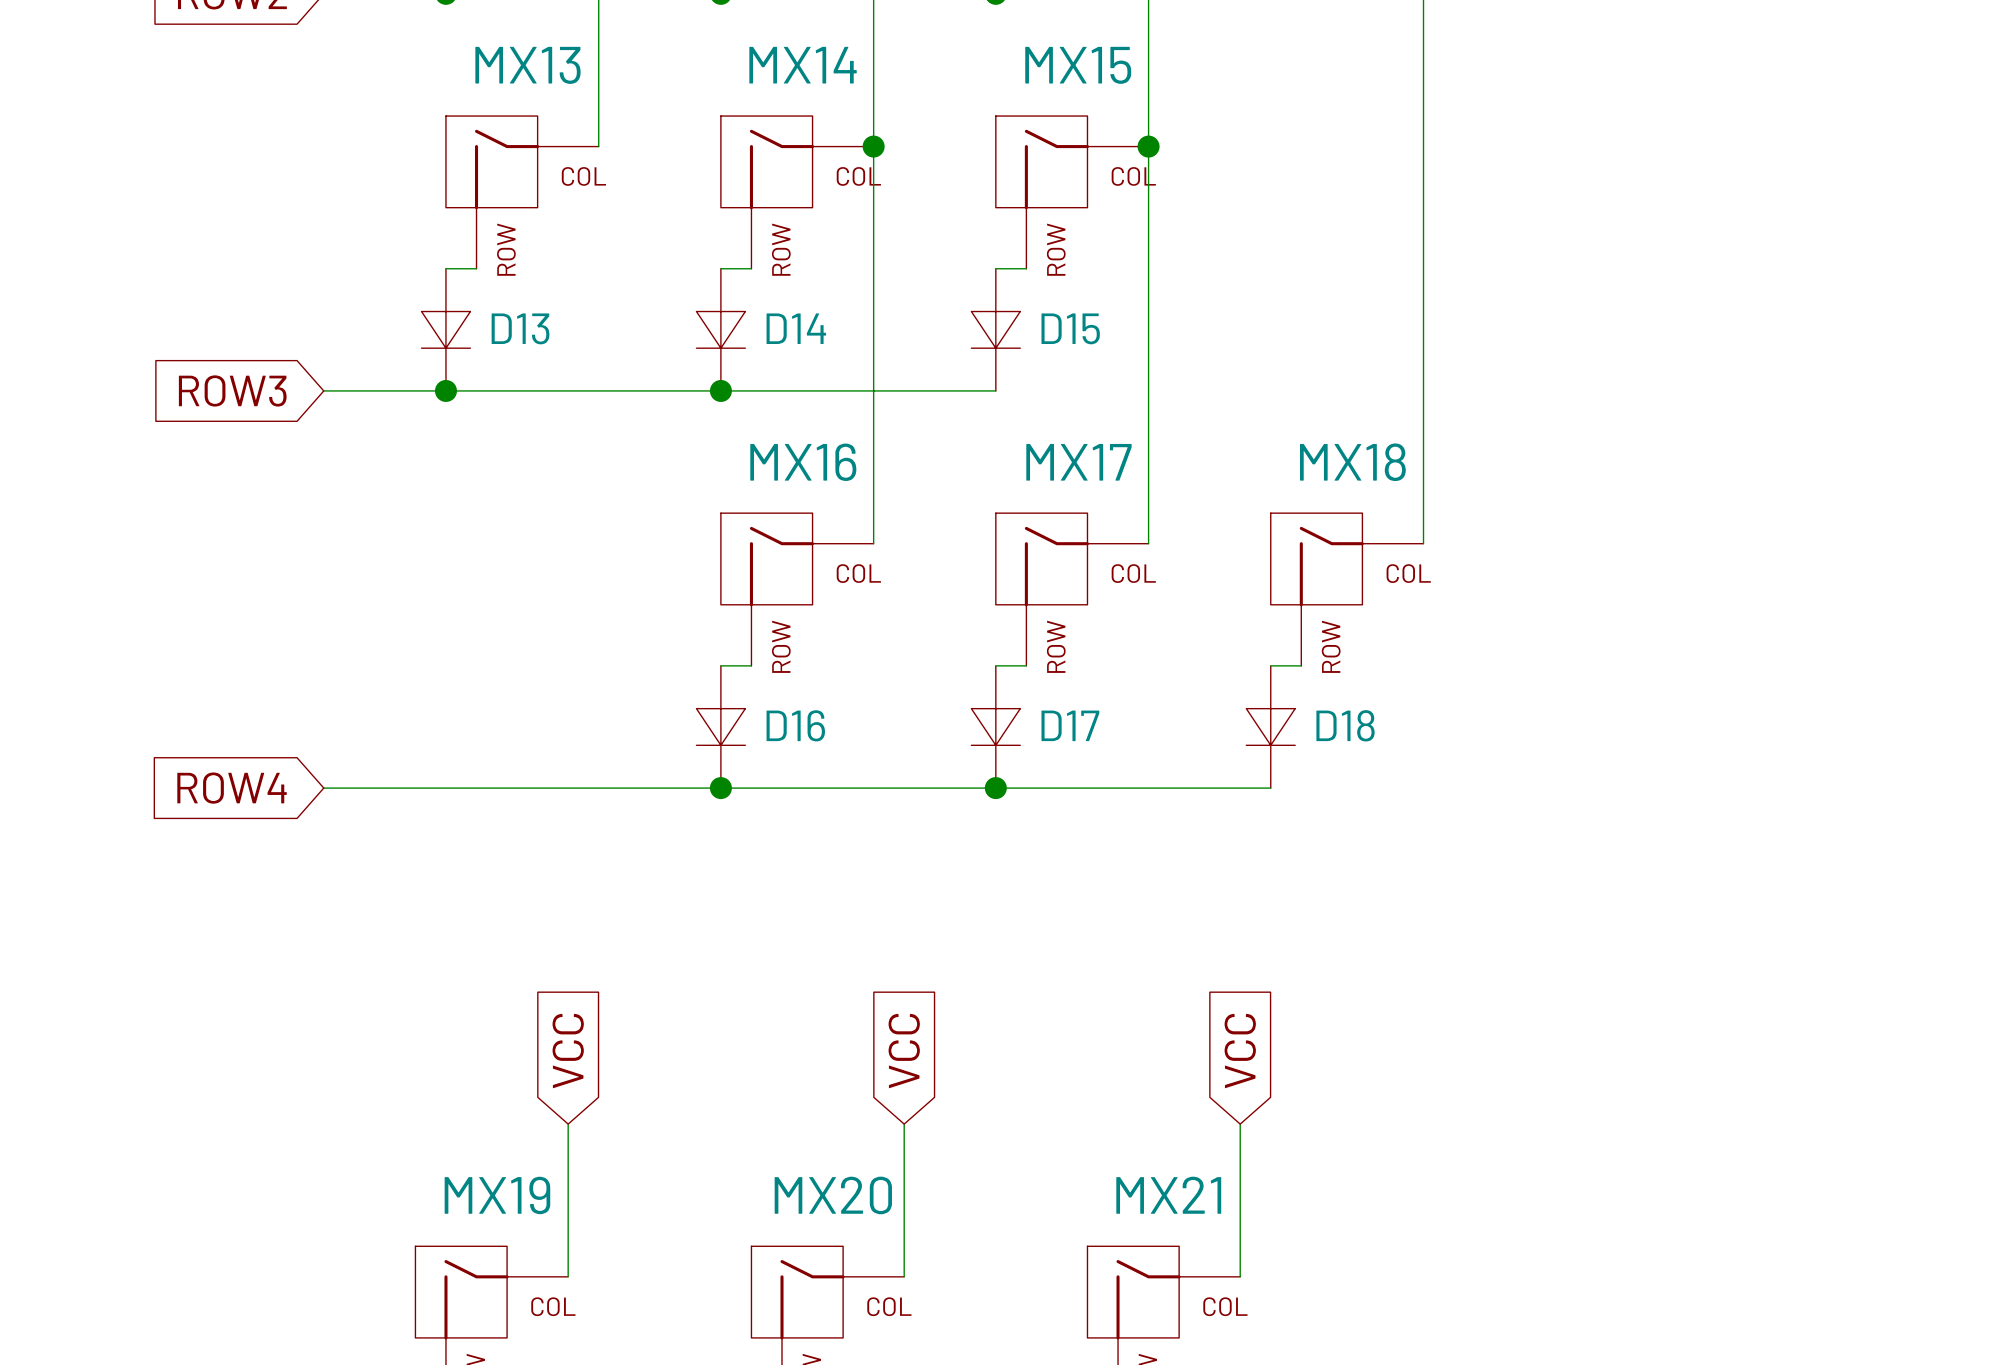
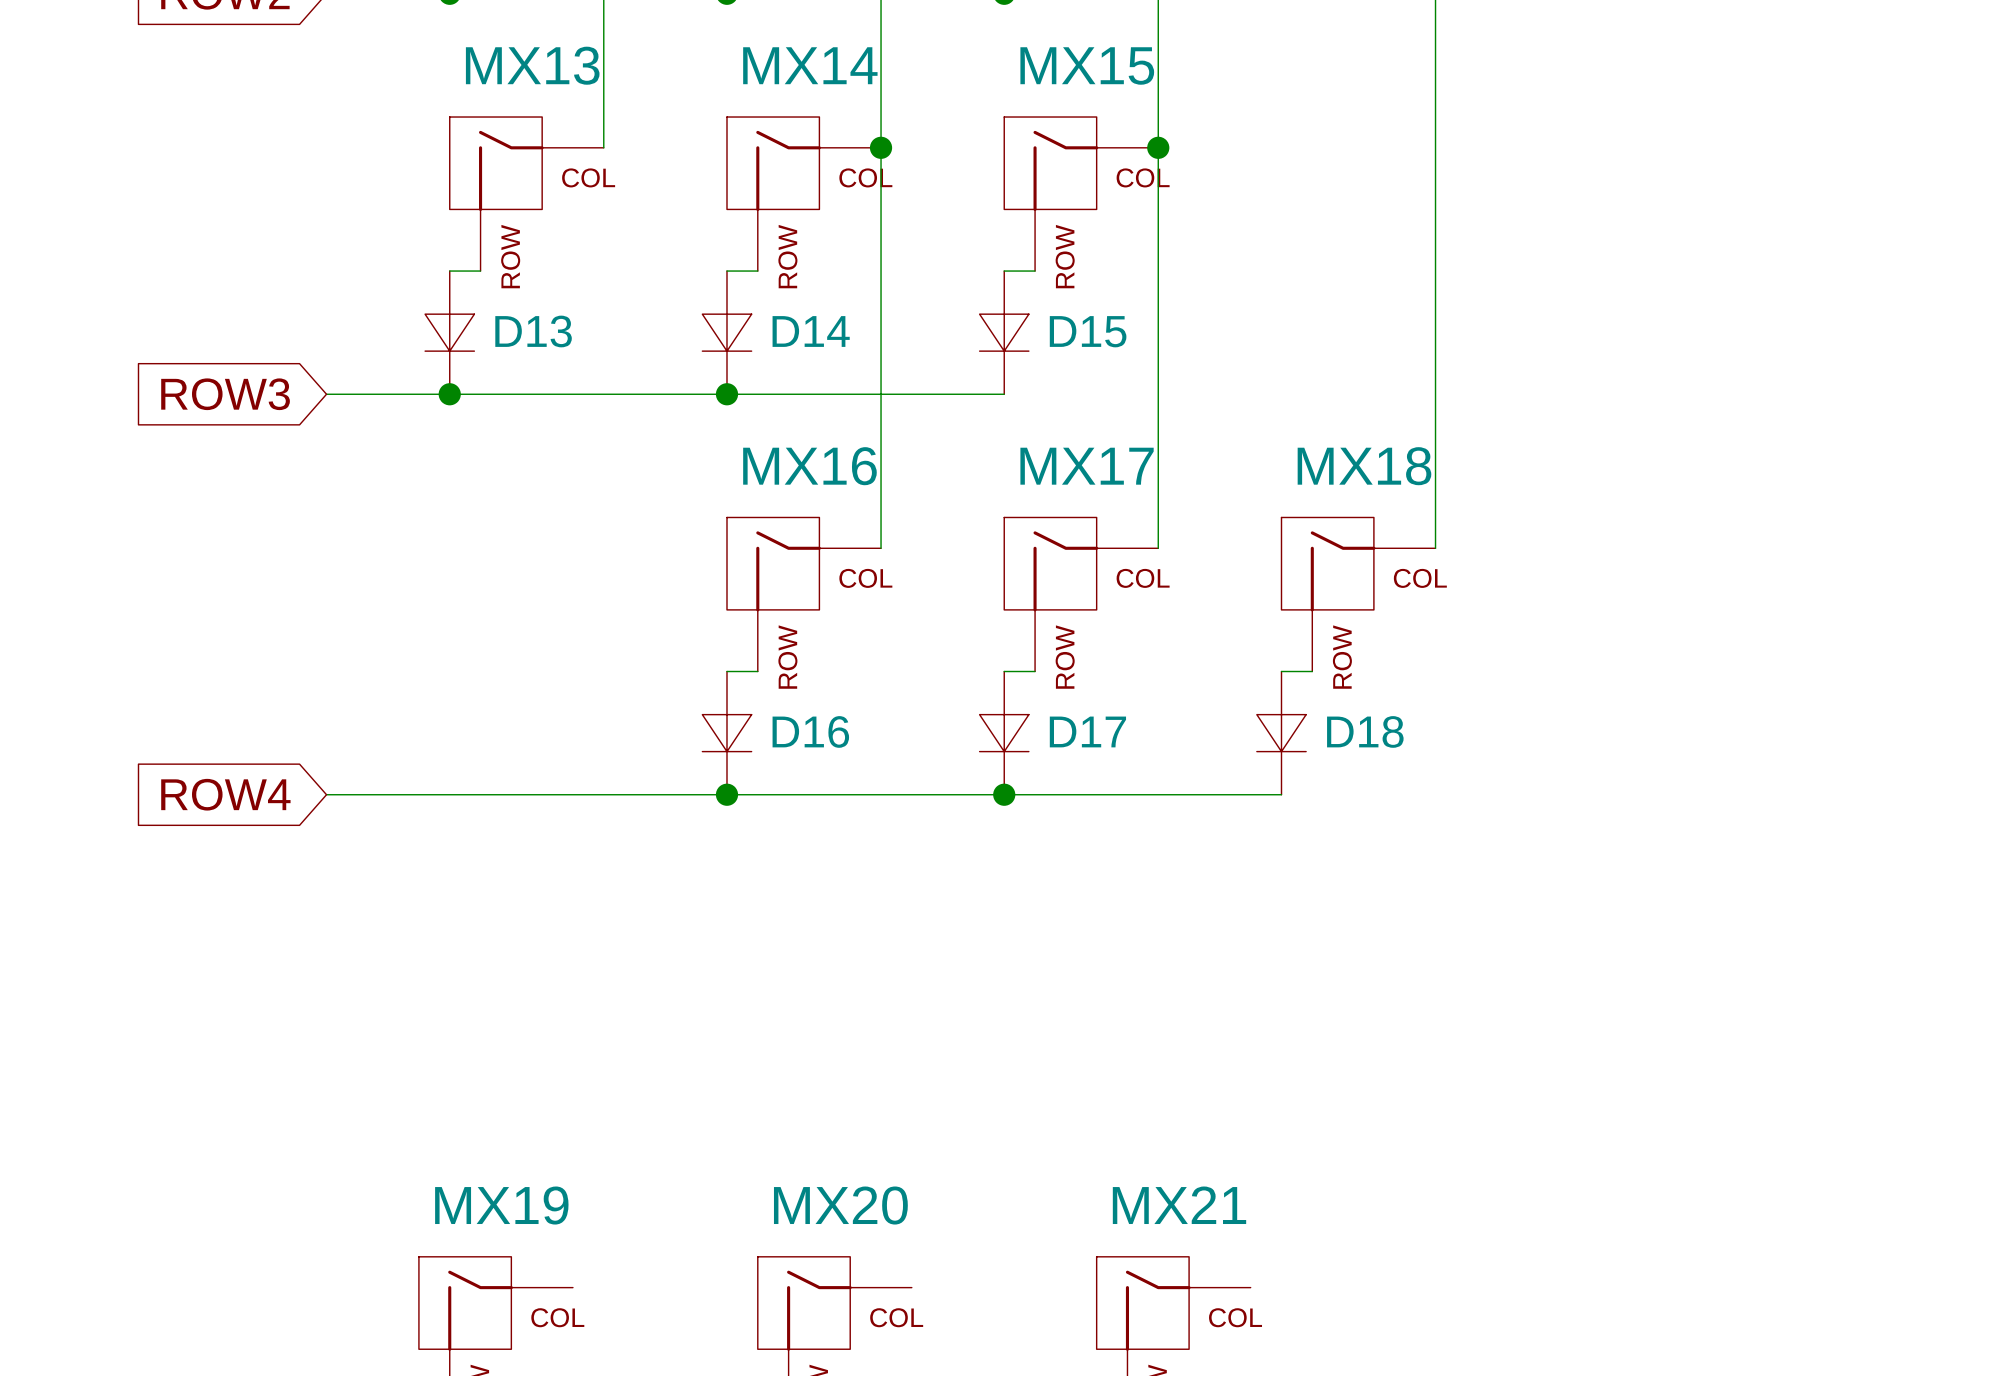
global label: VCC (568, 1051) -> none
global label: VCC (904, 1051) -> none
global label: VCC (1240, 1051) -> none
wire: (568, 1124) (568, 1276) -> none
wire: (904, 1124) (904, 1276) -> none
wire: (1240, 1124) (1240, 1276) -> none

